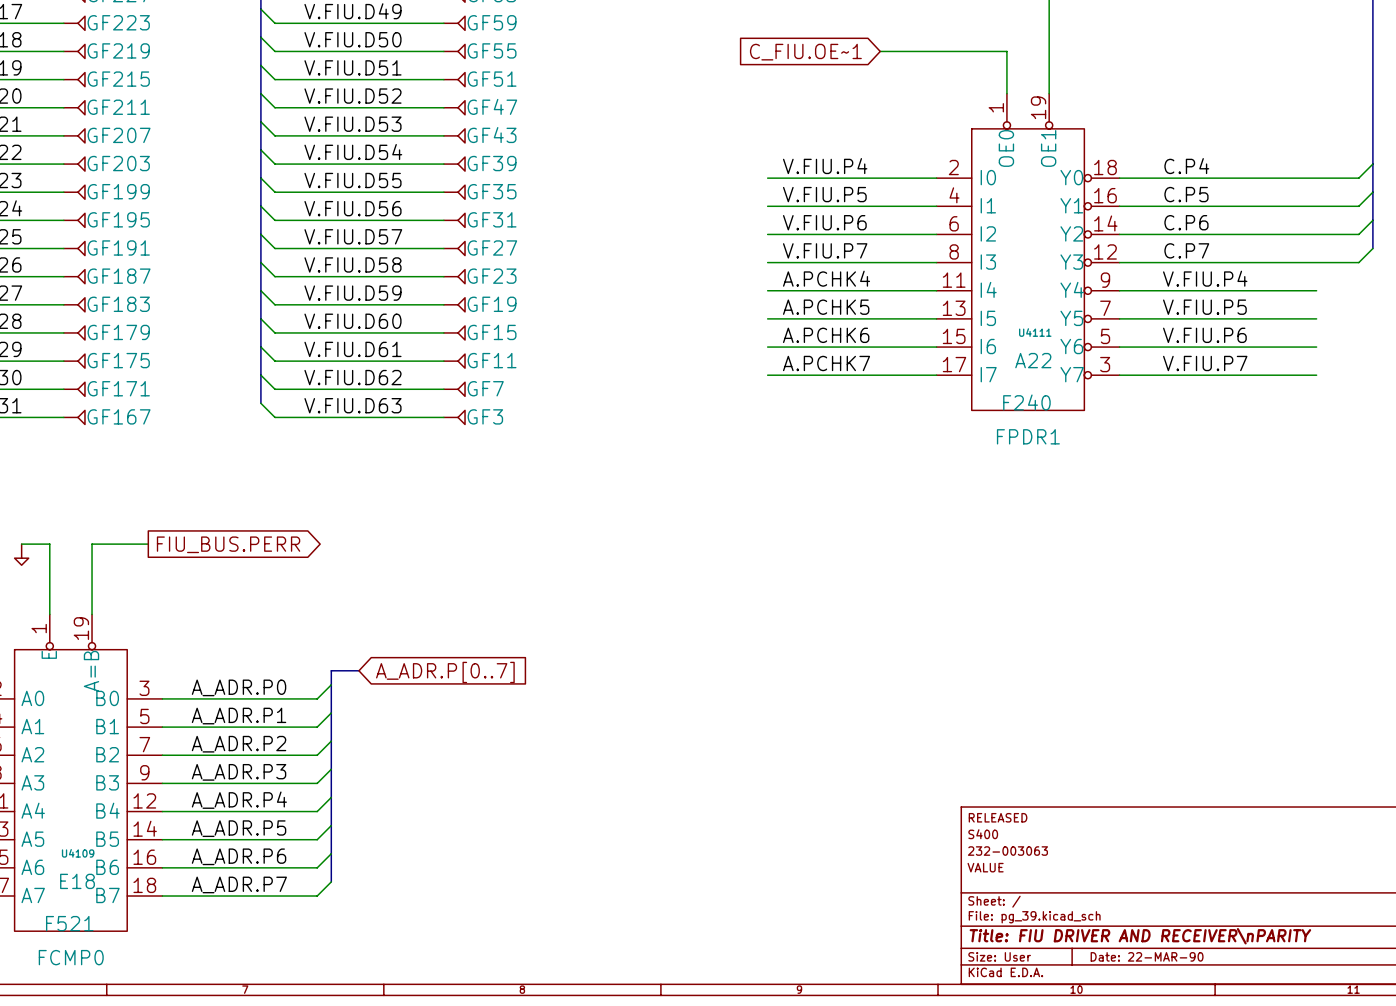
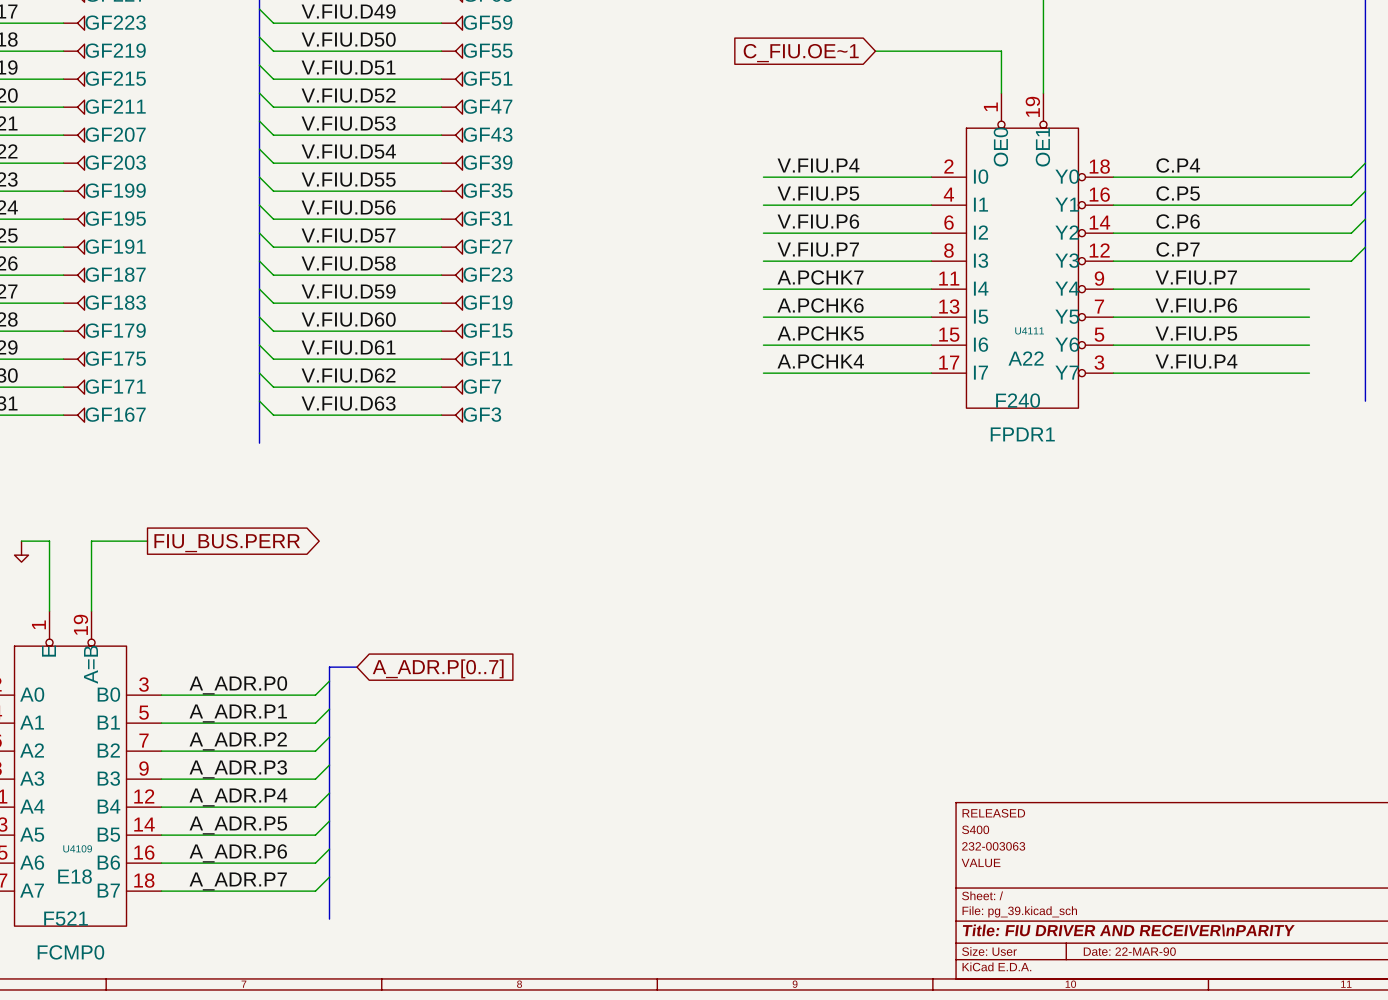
bus: none -> (1365, 247) (1365, 401)
label: A.PCHK4 (826, 278) -> A.PCHK7 (820, 277)
label: V.FIU.P4 (1205, 278) -> V.FIU.P7 (1196, 277)
label: A.PCHK5 (826, 307) -> A.PCHK6 (820, 305)
label: V.FIU.P5 (1204, 307) -> V.FIU.P6 (1196, 305)
label: A.PCHK6 (826, 335) -> A.PCHK5 (820, 333)
label: V.FIU.P6 (1204, 335) -> V.FIU.P5 (1196, 333)
label: A.PCHK7 (826, 363) -> A.PCHK4 (820, 361)
label: V.FIU.P7 (1205, 363) -> V.FIU.P4 (1196, 361)
bus: none -> (259, 401) (259, 443)
bus: none -> (329, 877) (329, 919)

